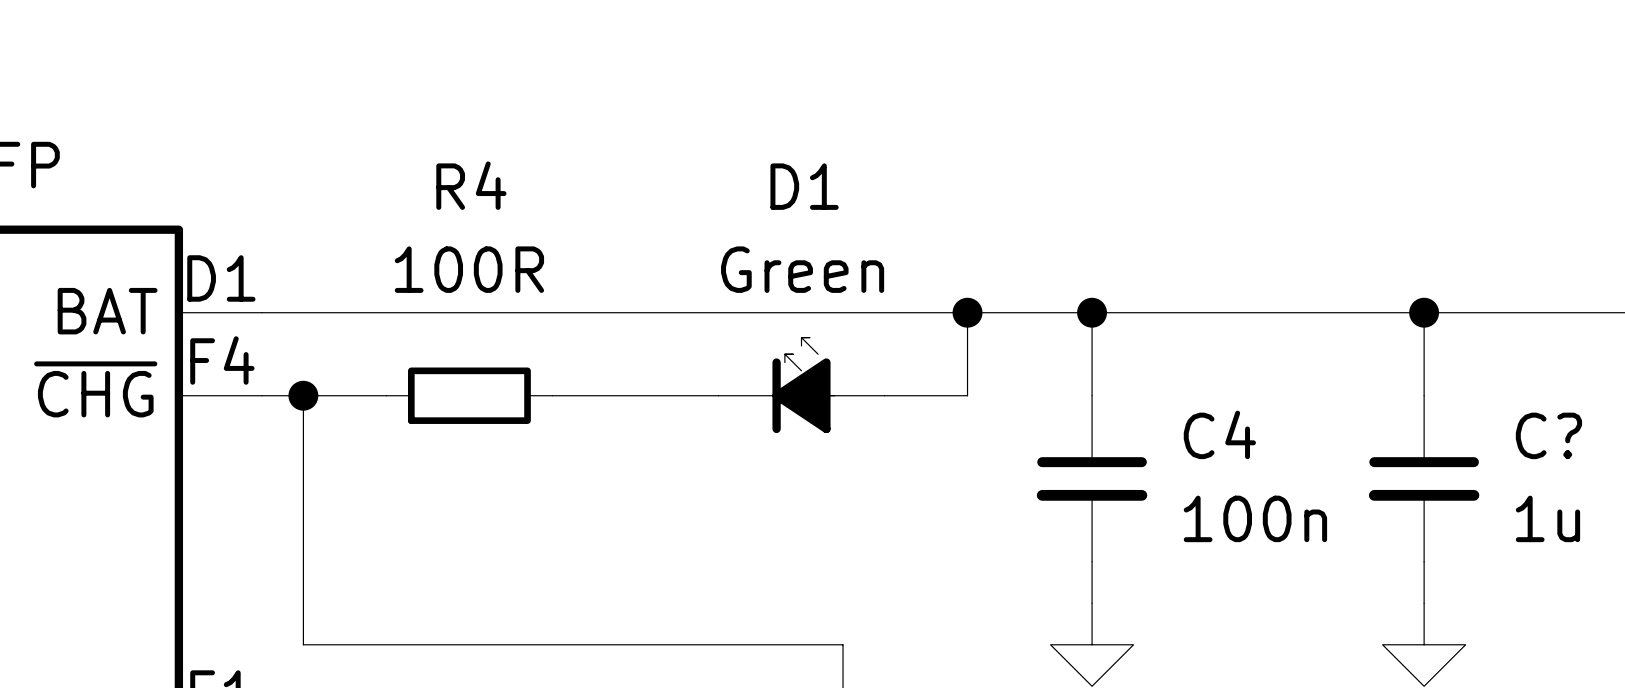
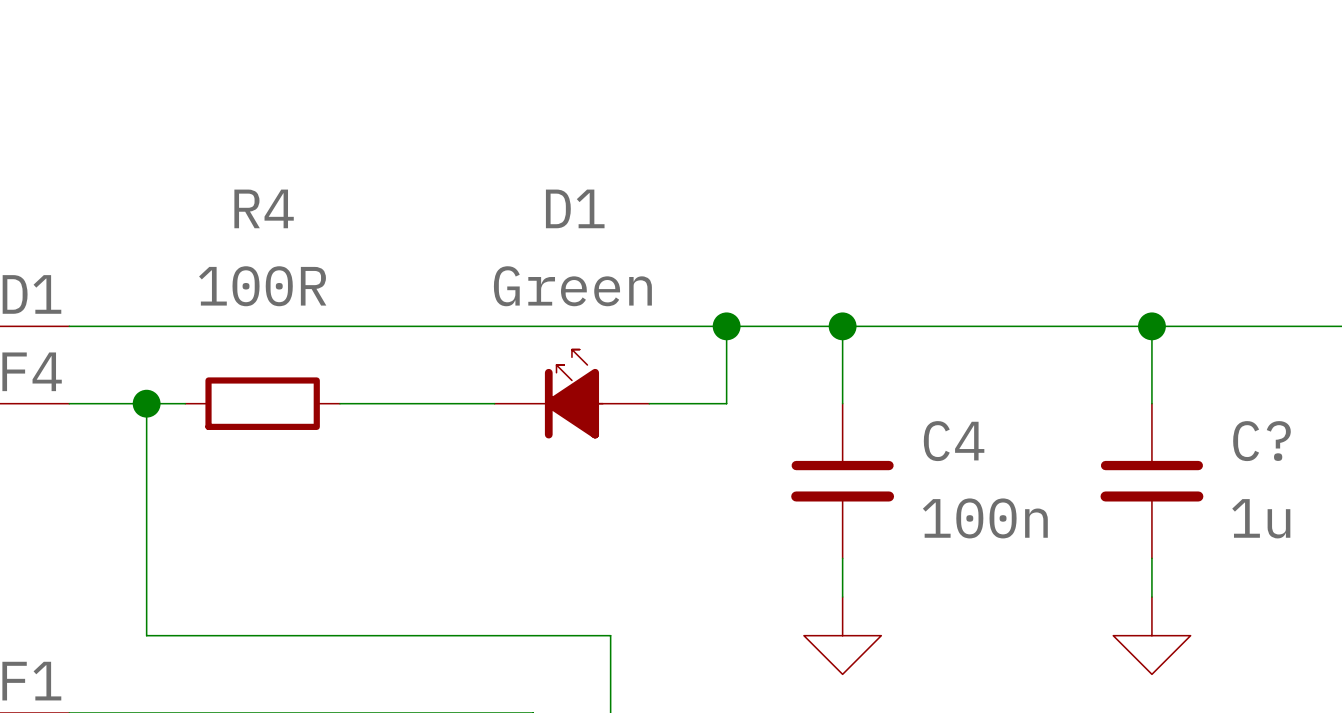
wire: (303, 395) (303, 644) (344, 644) -> (146, 403) (146, 635)
junction position: (303, 395) -> (146, 403)

